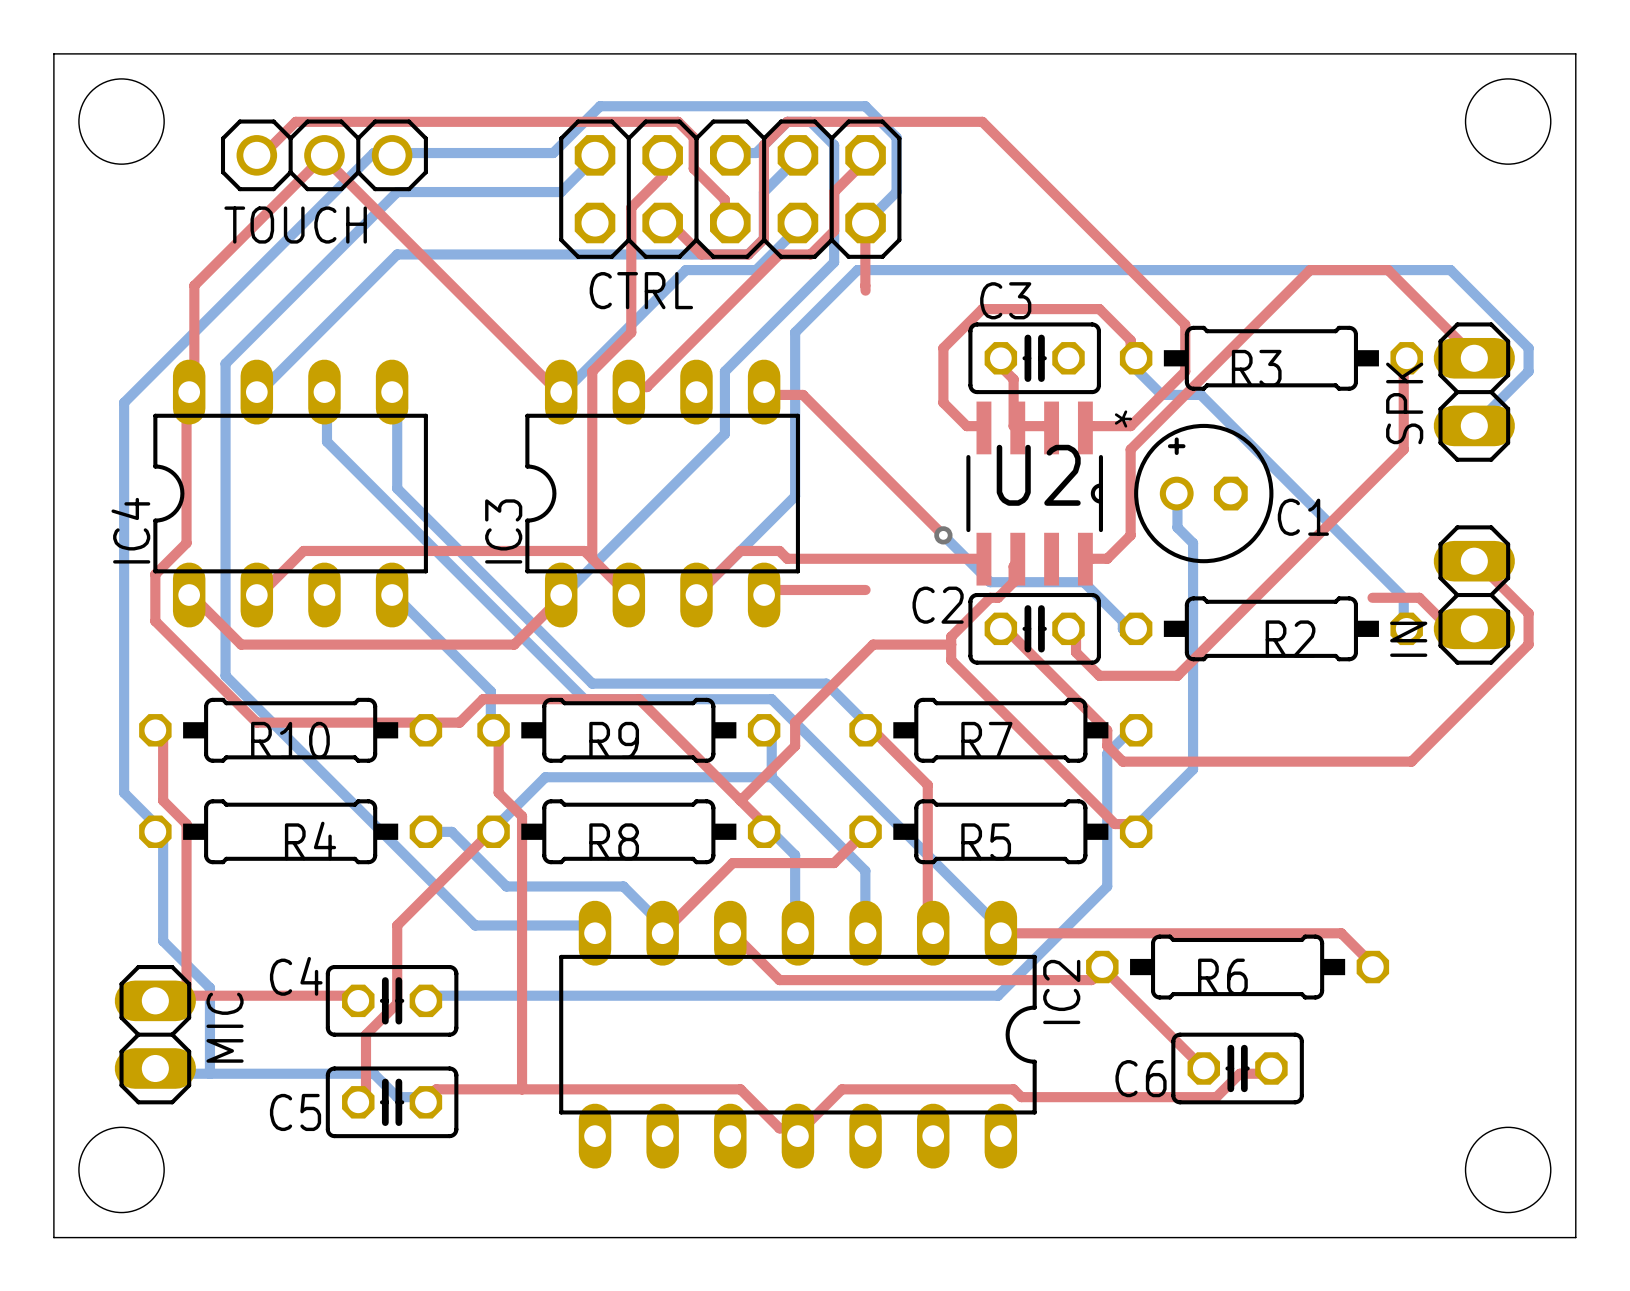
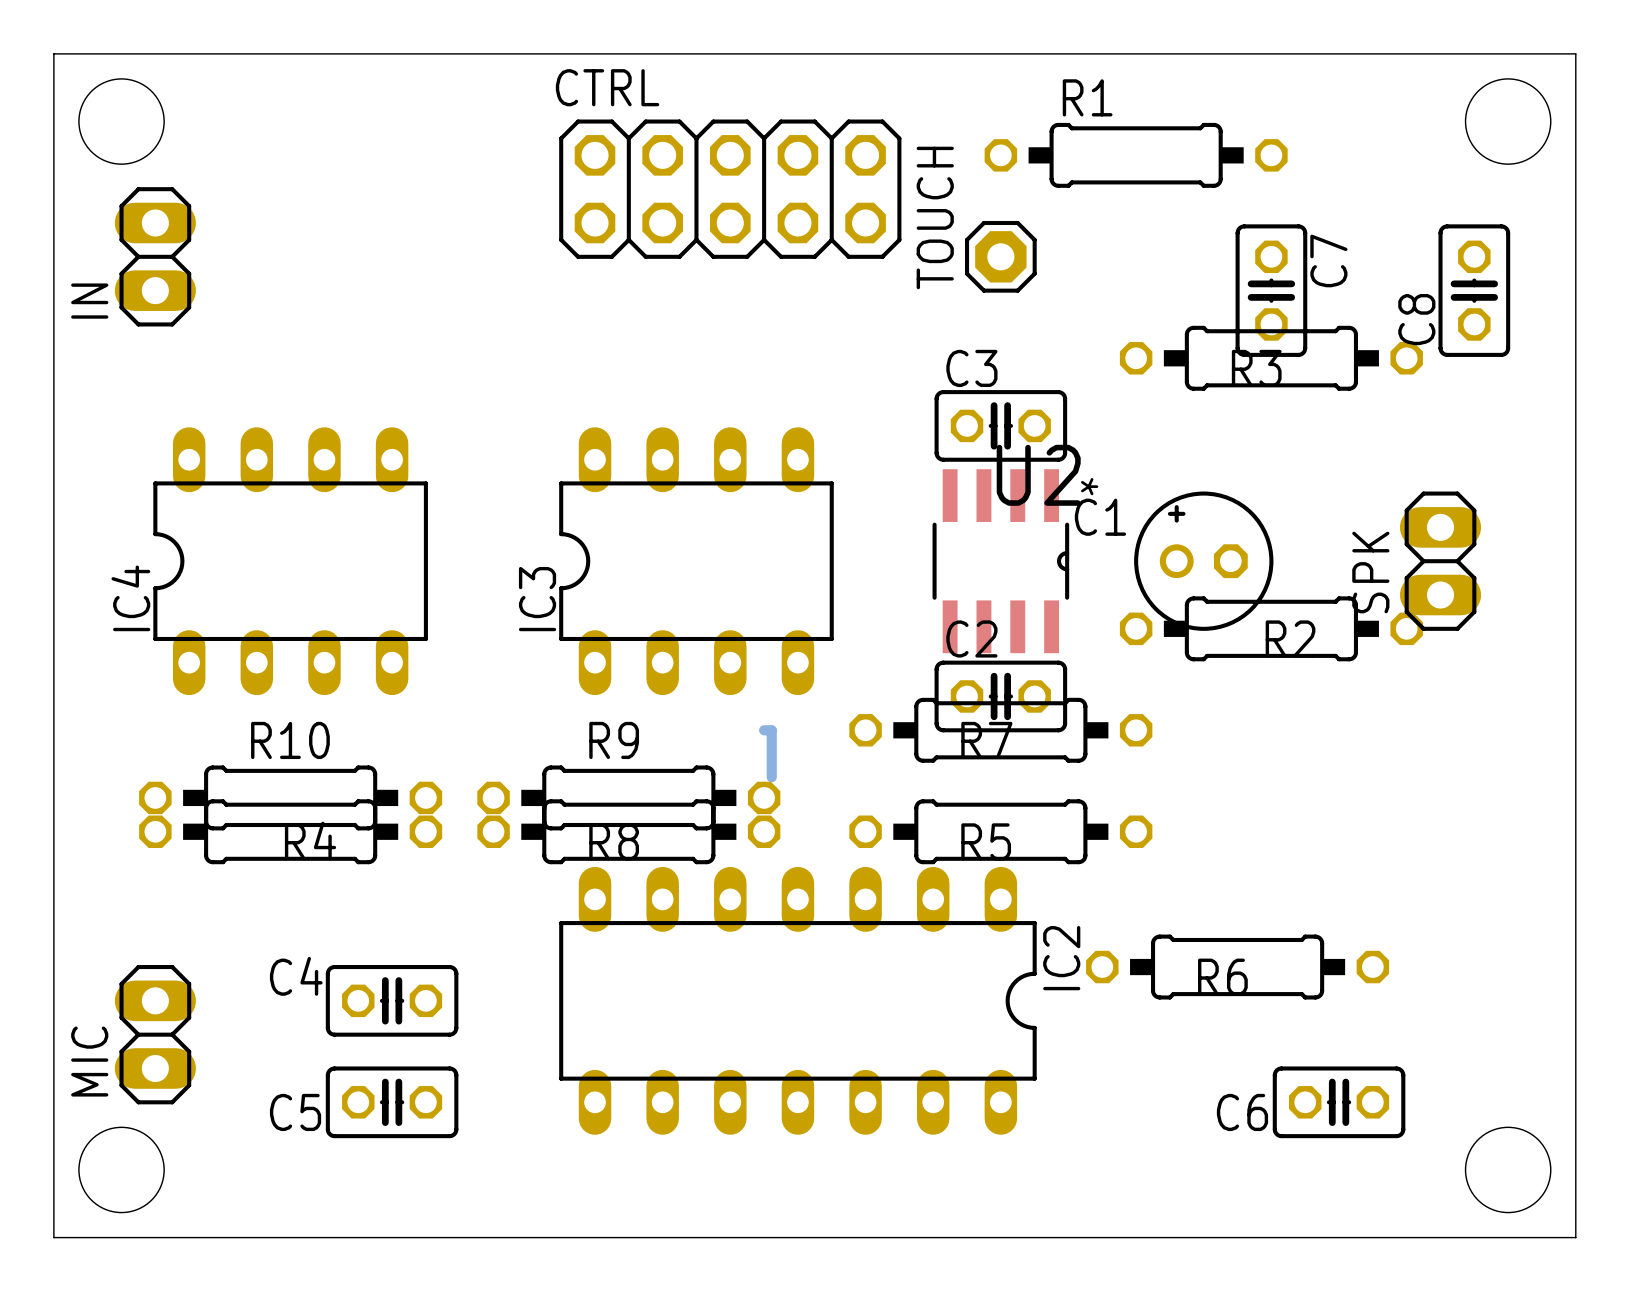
top track: (256, 155) (264, 153) (295, 121) (678, 121) (693, 137) (693, 168) (724, 199) (724, 215) (730, 223) -> none
TOUCH: (324, 155) -> none
bottom track: (595, 155) (592, 160) (561, 192) (397, 192) (225, 363) (225, 675) (475, 925) (592, 925) (595, 933) -> none
top track: (662, 155) (662, 176) (631, 207) (631, 332) (592, 371) (592, 558) -> none
bottom track: (730, 155) (732, 153) (756, 153) (787, 121) (810, 121) (834, 145) (834, 262) (724, 371) (724, 433) (568, 589) (561, 595) -> none
bottom track: (797, 155) (795, 160) (763, 192) (763, 238) (748, 254) (397, 254) (264, 387) (256, 392) -> none
top track: (865, 155) (865, 160) (834, 192) (834, 231) (810, 254) (779, 254) (646, 387) (631, 387) (628, 392) -> none
R1: none -> (1136, 155)
top track: (662, 223) (670, 223) (701, 254) (748, 254) (763, 238) (763, 145) (787, 121) (982, 121) (1185, 324) (1185, 371) (1130, 426) (1091, 426) (1085, 427) -> none
bottom track: (797, 223) (802, 223) (756, 270) (685, 270) (568, 387) (561, 392) -> none
top track: (865, 223) (865, 290) -> none
bottom track: (865, 223) (896, 192) (896, 137) (865, 106) (600, 106) (553, 153) (397, 153) (392, 155) (389, 153) (373, 153) (124, 402) (124, 792) (155, 824) (155, 831) (163, 831) (163, 941) (209, 987) (209, 1073) -> none
IN: none -> (155, 256)
TOUCH: none -> (1000, 256)
CTRL name position: CTRL (641, 290) -> CTRL (607, 87)
C7: none -> (1271, 290)
C8: none -> (1474, 290)
top track: (1000, 358) (998, 363) (1013, 379) (1013, 426) (1017, 427) (1021, 426) (1051, 427) -> none
C3 position: (1034, 358) -> (1000, 425)
top track: (1136, 358) (1130, 355) (1130, 340) (1099, 309) (982, 309) (943, 348) (943, 402) (966, 426) (982, 426) (983, 427) -> none
bottom track: (1136, 358) (1130, 363) (1161, 394) (1200, 394) (1403, 597) (1403, 621) (1406, 628) -> none
top track: (1406, 358) (1403, 363) (1403, 449) (1177, 675) (1099, 675) (1076, 652) (1076, 628) (1068, 628) -> none
top track: (1474, 358) (1388, 270) (1310, 270) (1130, 449) (1130, 535) (1107, 558) (1085, 559) -> none
bottom track: (324, 392) (326, 394) (326, 441) (584, 699) (771, 699) (998, 925) (1000, 933) -> none
bottom track: (392, 392) (397, 394) (397, 488) (592, 683) (826, 683) (865, 722) (865, 730) -> none
top track: (561, 392) (561, 394) (326, 160) (324, 155) (194, 285) (194, 387) (186, 394) (186, 543) (155, 574) (155, 621) (256, 722) (420, 722) (425, 730) (428, 722) (459, 722) (483, 699) (639, 699) (763, 824) (764, 831) -> none
top track: (764, 392) (771, 394) (802, 394) (943, 535) -> none
SPK position: (1474, 392) -> (1440, 561)
bottom track: (1474, 425) (1528, 371) (1528, 348) (1450, 270) (857, 270) (795, 332) (795, 496) (696, 595) -> none
IC4 position: (290, 493) -> (290, 561)
IC3 position: (662, 493) -> (696, 561)
U2 position: (1034, 493) -> (1000, 561)
bottom track: (1176, 493) (1177, 527) (1193, 543) (1193, 769) (1138, 824) (1136, 831) -> none
C1 position: (1203, 493) -> (1203, 561)
C1 name position: C1 (1303, 517) -> C1 (1100, 517)
bottom track: (943, 535) (990, 582) (1083, 582) (1122, 621) (1122, 628) (1130, 636) (1138, 628) (1136, 628) -> none
via: (943, 535) -> none
top track: (983, 559) (787, 558) (779, 550) (740, 550) (696, 595) -> none
top track: (1017, 559) (1013, 566) (1013, 582) (998, 597) (990, 597) (951, 636) (951, 660) (1115, 824) (1130, 824) (1136, 831) -> none
top track: (1474, 561) (1528, 613) (1528, 644) (1411, 761) (1122, 761) (1107, 746) (1107, 730) (1005, 628) (1000, 628) -> none
top track: (865, 589) (771, 589) (764, 595) -> none
top track: (189, 595) (194, 597) (241, 644) (514, 644) (561, 597) (561, 595) -> none
top track: (256, 595) (264, 589) (303, 550) (584, 550) (628, 595) -> none
bottom track: (392, 595) (397, 597) (490, 691) (490, 722) (493, 730) -> none
IN: (1474, 595) -> none
top track: (1372, 597) (1419, 597) (1442, 621) (1473, 621) (1474, 628) -> none
C2 name position: C2 (938, 605) -> C2 (971, 638)
C2 position: (1034, 628) -> (1000, 696)
top track: (951, 644) (873, 644) (795, 722) (795, 746) (740, 800) -> none
top track: (155, 730) (163, 730) (163, 800) (186, 824) (186, 995) (155, 1000) (163, 995) (358, 995) (358, 1000) -> none
R10 position: (290, 730) -> (290, 797)
top track: (493, 730) (498, 730) (498, 792) (522, 816) (522, 1089) -> none
R9 position: (628, 730) -> (628, 797)
top track: (865, 730) (873, 730) (927, 785) (927, 925) (933, 933) -> none
bottom track: (1136, 730) (1130, 730) (1107, 753) (1107, 886) (998, 995) (428, 995) (425, 1000) -> none
bottom track: (425, 831) (451, 831) (506, 886) (623, 886) (662, 925) (662, 933) -> none
top track: (493, 831) (490, 831) (397, 925) (397, 1003) (366, 1034) (366, 1097) (358, 1102) -> none
bottom track: (493, 831) (498, 824) (545, 777) (771, 777) (865, 870) (865, 933) -> none
bottom track: (764, 831) (771, 831) (795, 855) (795, 925) (797, 933) -> none
top track: (865, 831) (834, 863) (732, 863) (662, 933) -> none
top track: (730, 933) (732, 933) (779, 980) (1091, 980) (1102, 967) (1203, 1068) -> none
top track: (1000, 933) (1341, 933) (1372, 967) -> none
MIC name position: MIC (225, 1027) -> MIC (89, 1061)
IC2 position: (797, 1034) -> (797, 1000)
bottom track: (155, 1068) (163, 1073) (373, 1073) (397, 1097) (420, 1097) (425, 1102) -> none
C6 position: (1237, 1068) -> (1339, 1102)
top track: (1271, 1068) (1271, 1073) (1239, 1073) (1216, 1097) (1021, 1097) (1013, 1089) (841, 1089) (802, 1128) (797, 1136) (795, 1128) (779, 1128) (740, 1089) (436, 1089) (425, 1102) -> none

